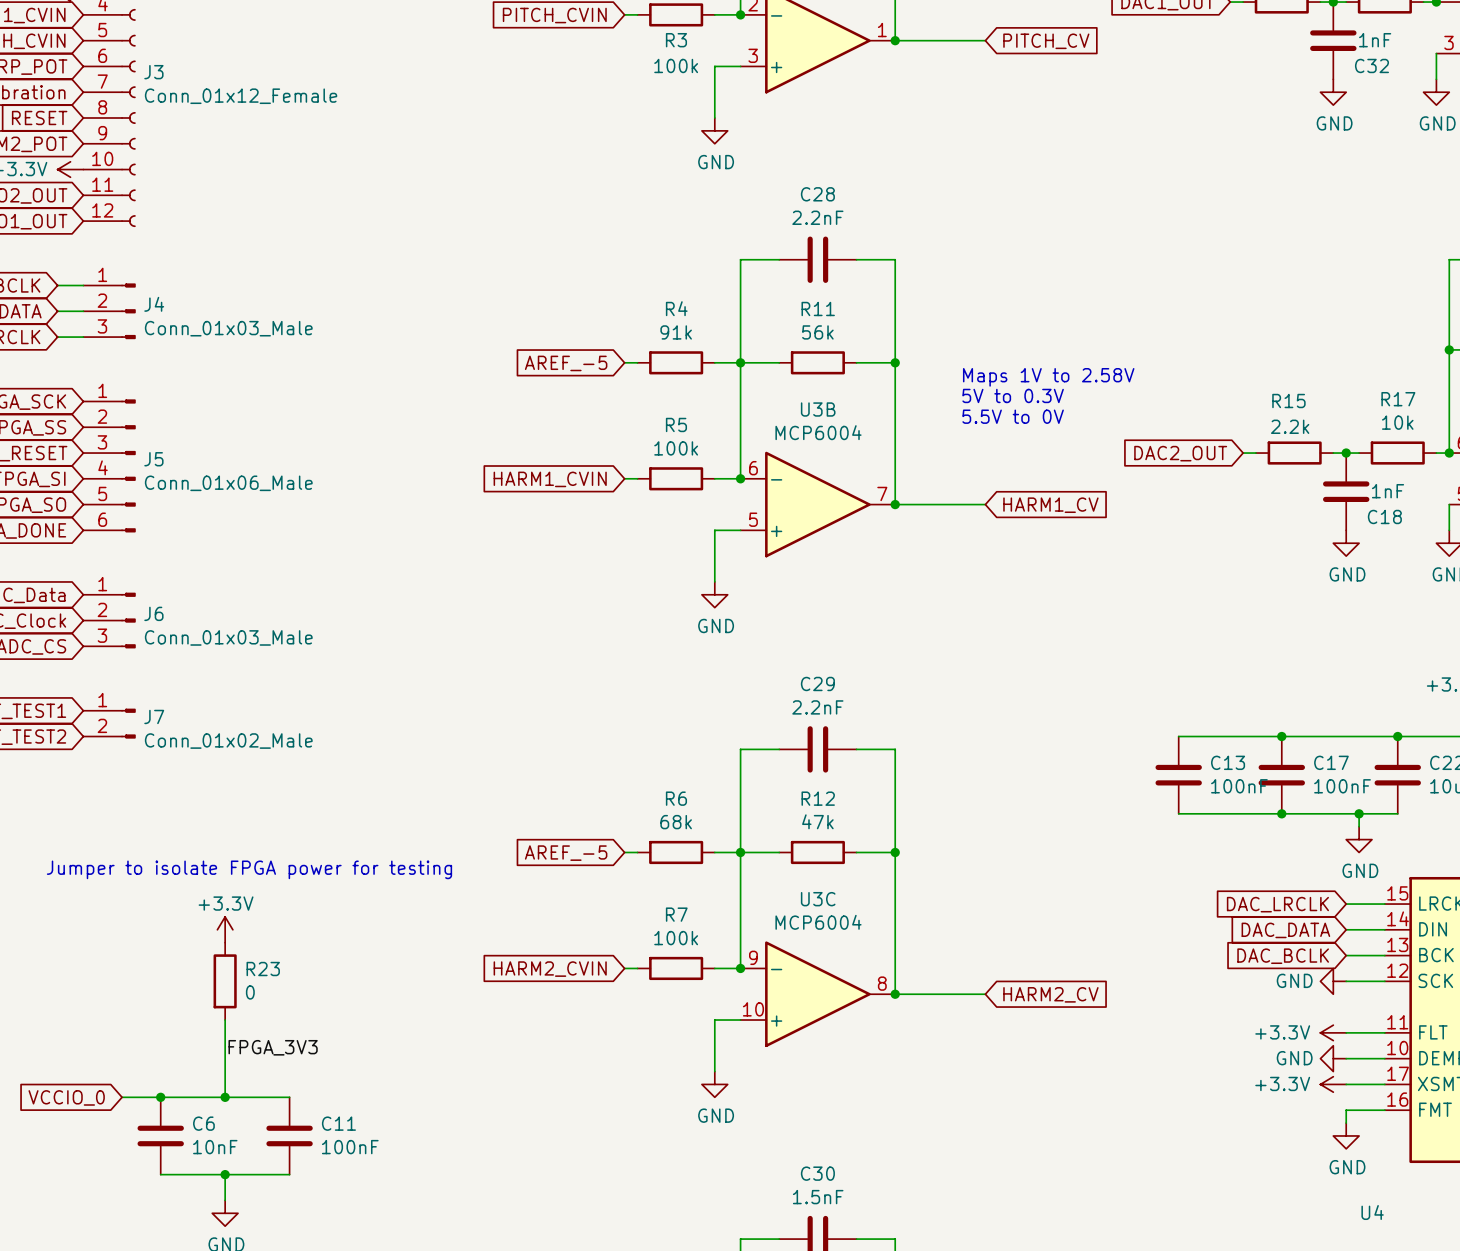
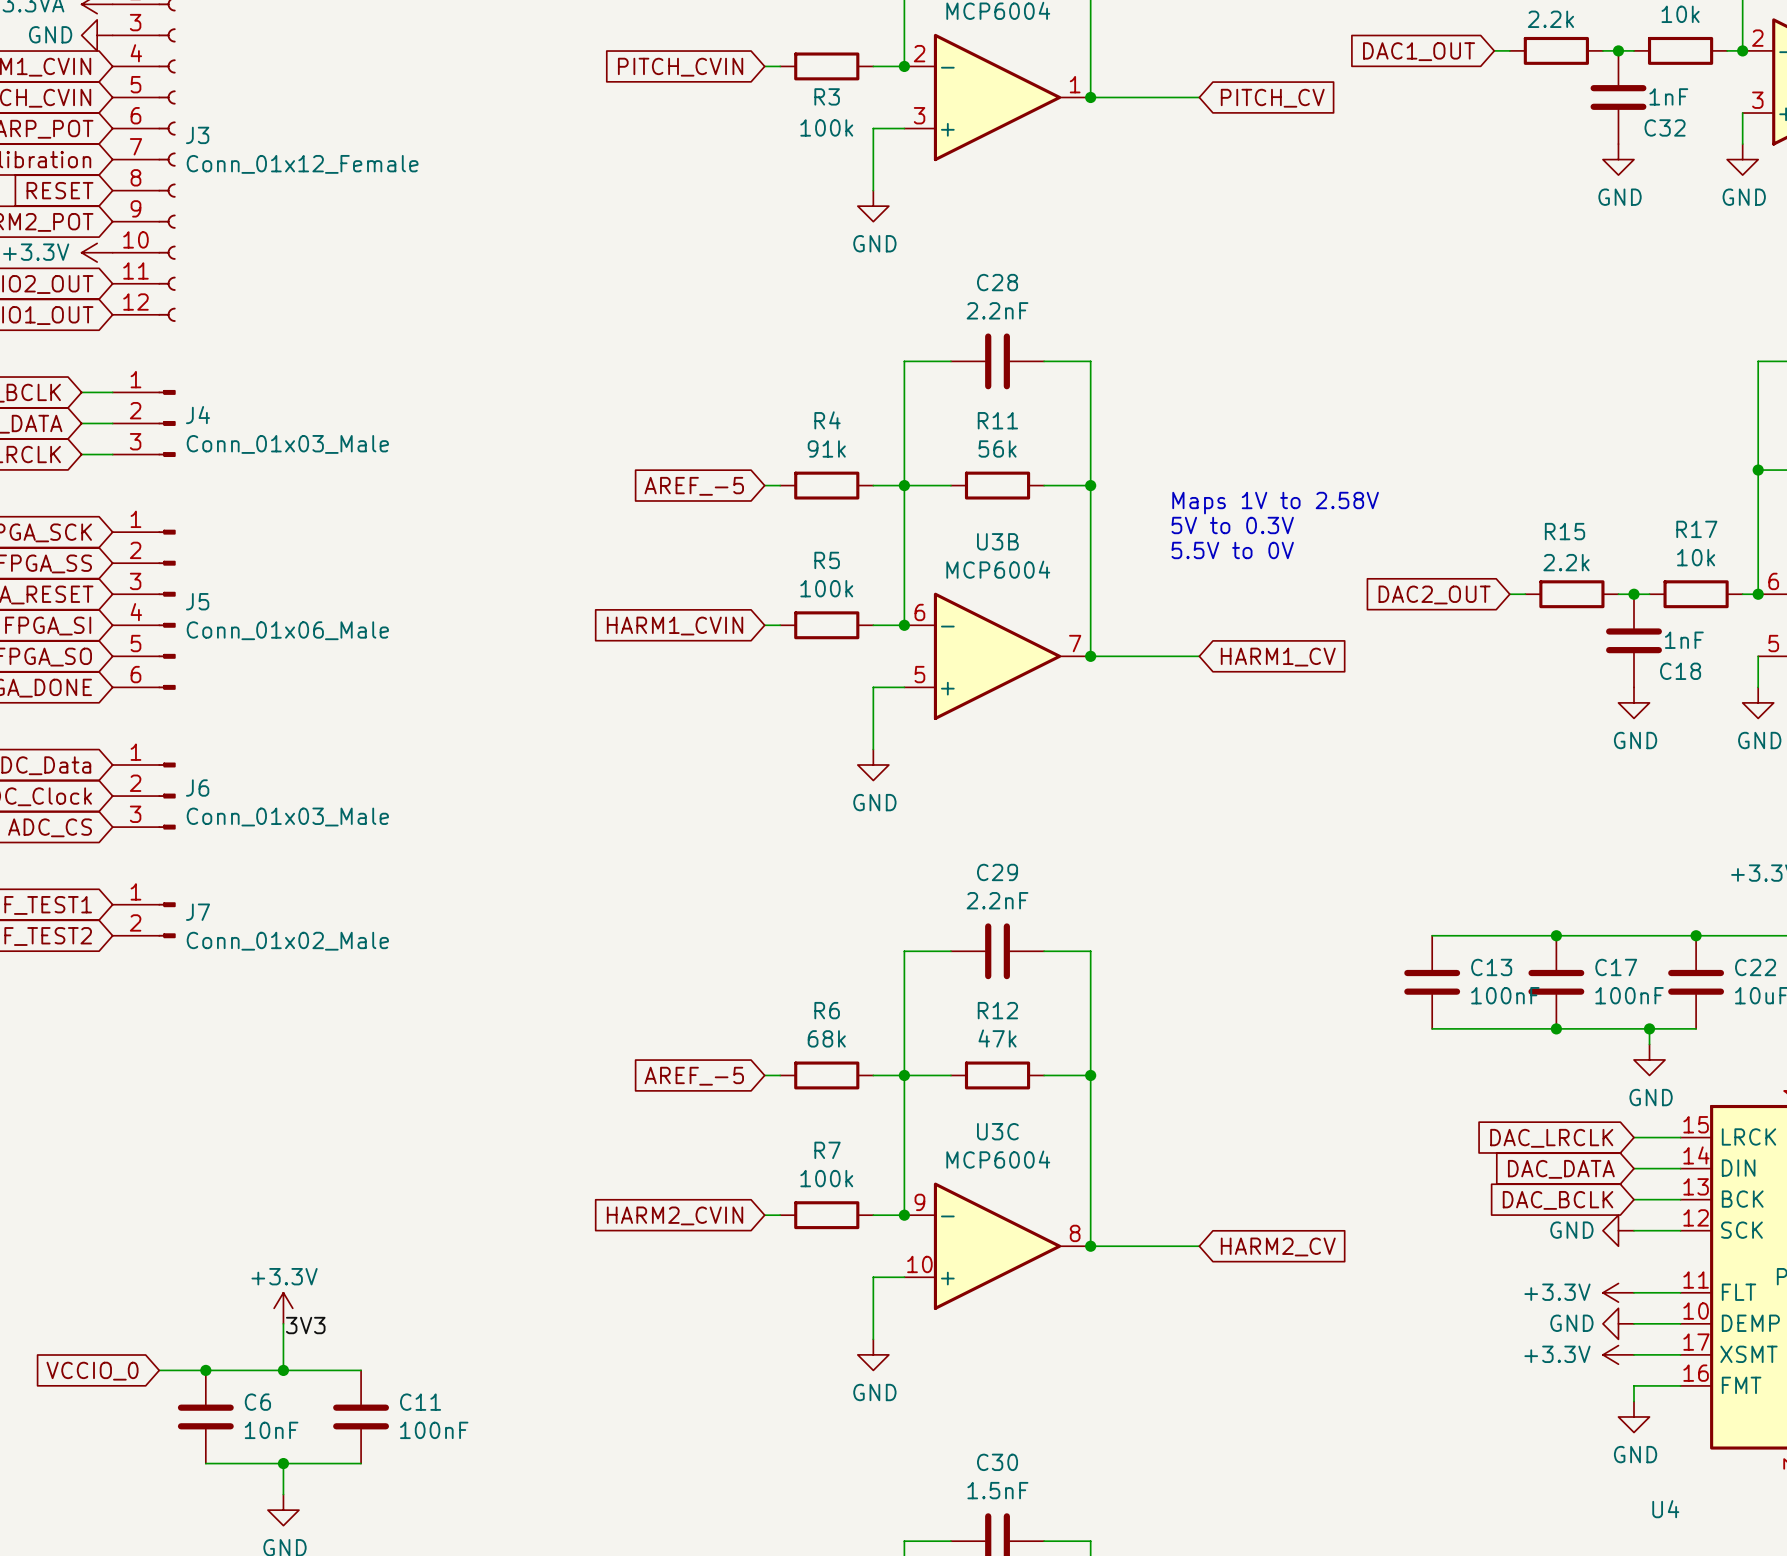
text: Jumper to isolate FPGA power for testing (249, 869) -> none
power symbol position: +3.3V (225, 929) -> +3.3V (283, 1308)
R23: 0 (225, 981) -> none
label: FPGA_3V3 (273, 1047) -> none
label: none -> 3V3 (305, 1325)

